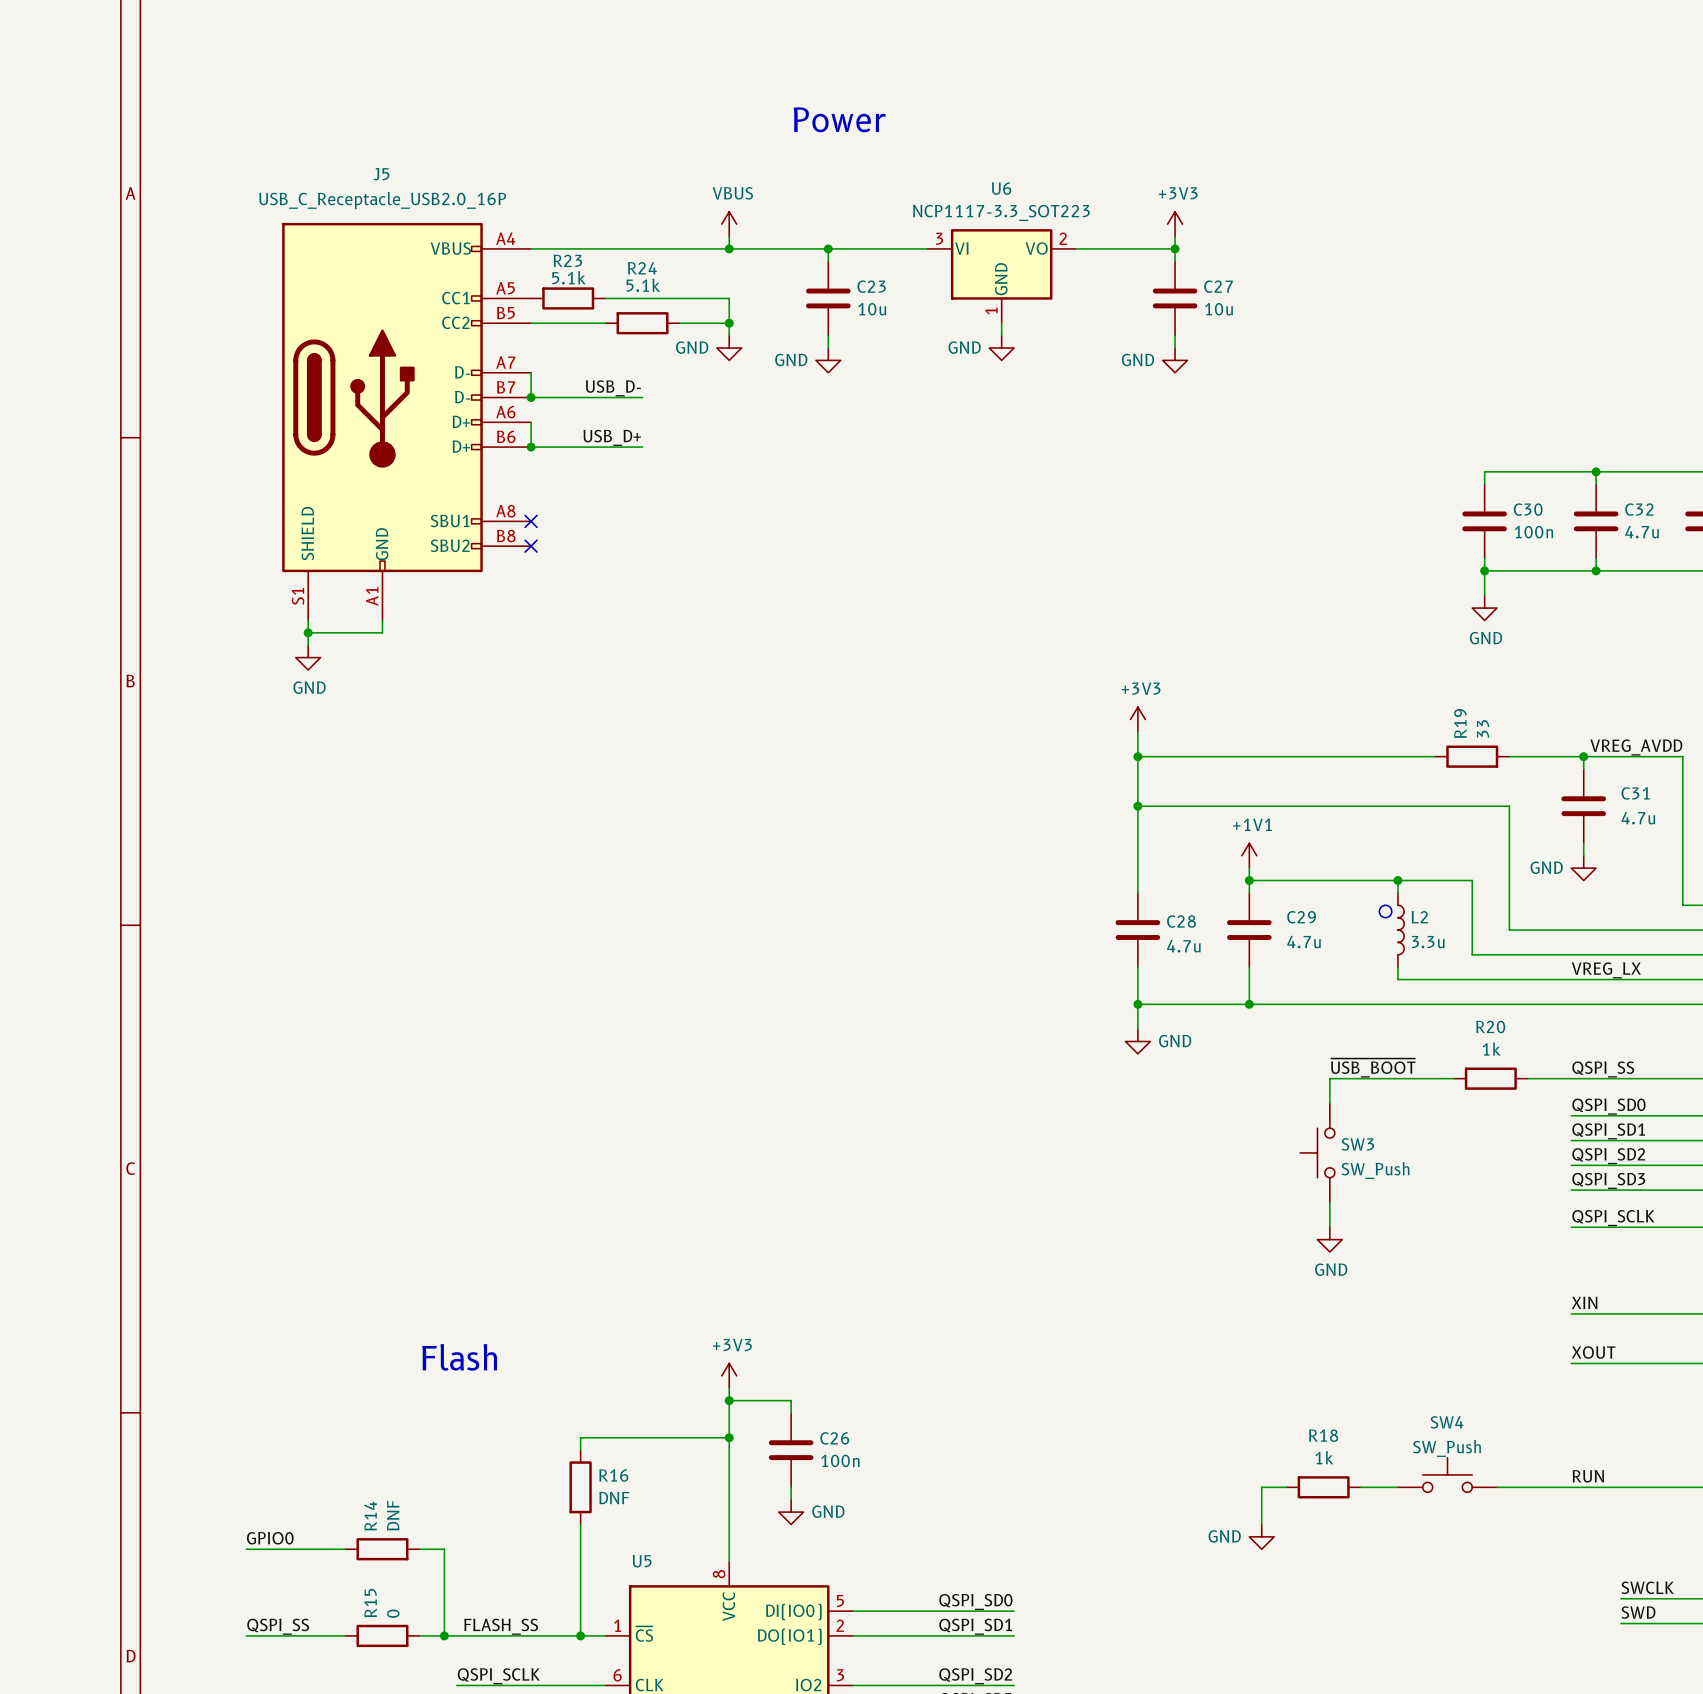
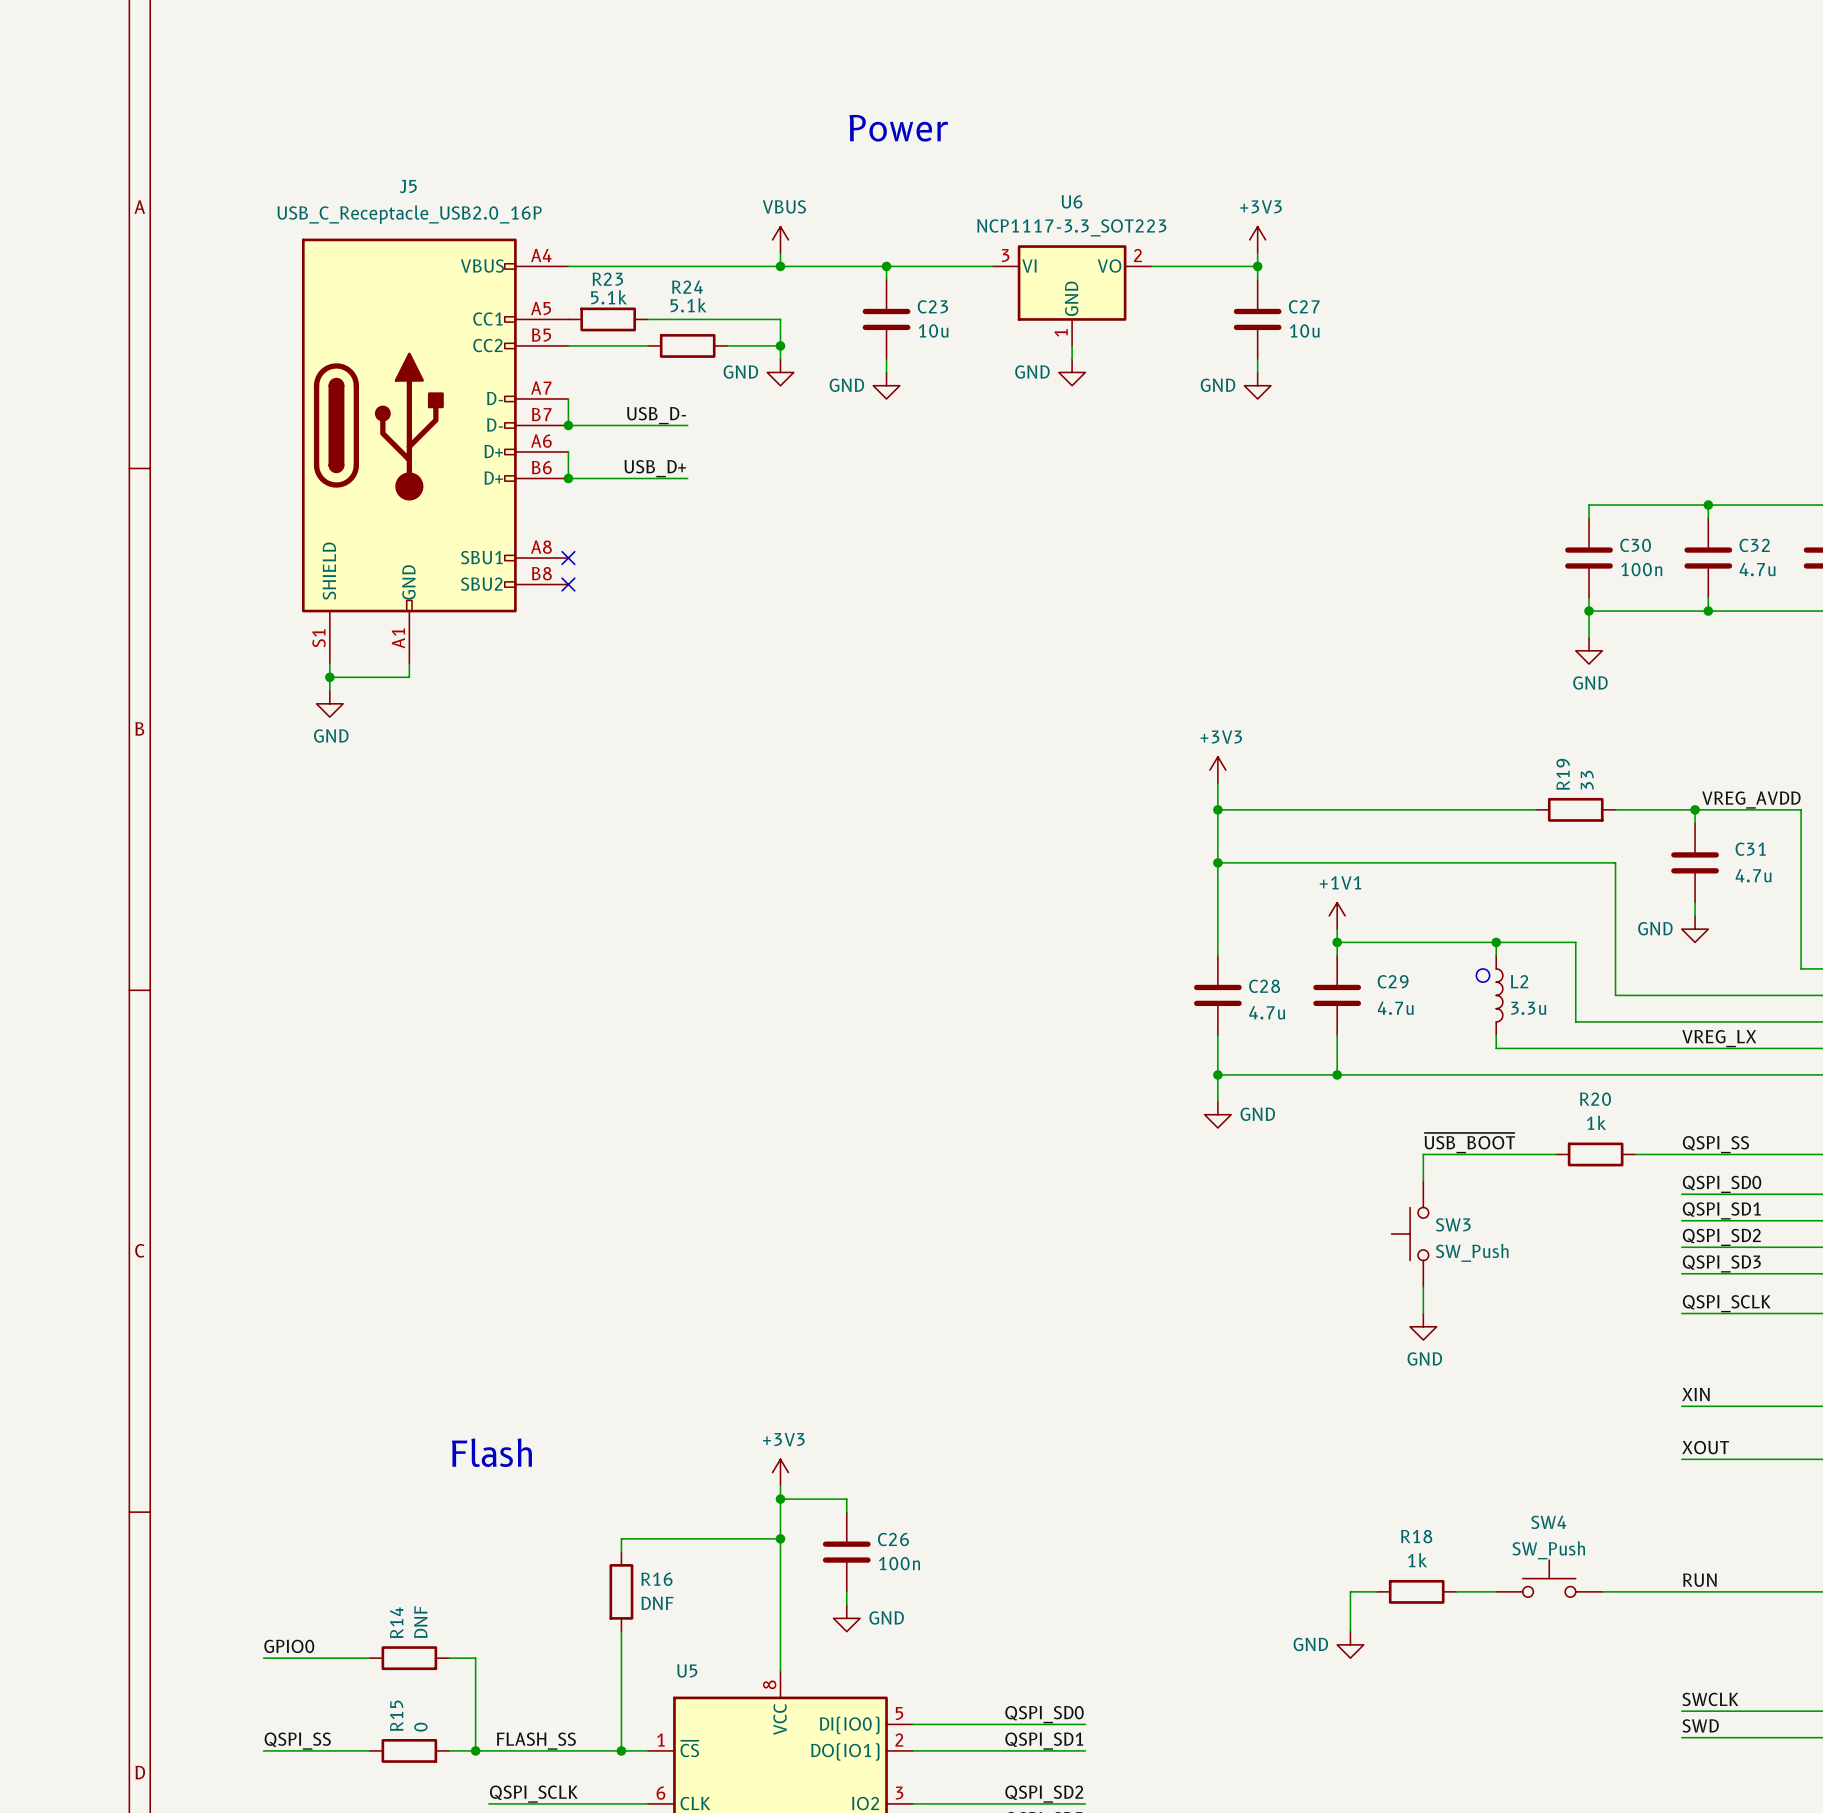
label position: SWCLK (1647, 1587) -> SWCLK (1710, 1699)
wire: none -> (1681, 1711) (1734, 1711)
label position: SWD (1638, 1612) -> SWD (1700, 1725)
wire: none -> (1681, 1737) (1734, 1737)

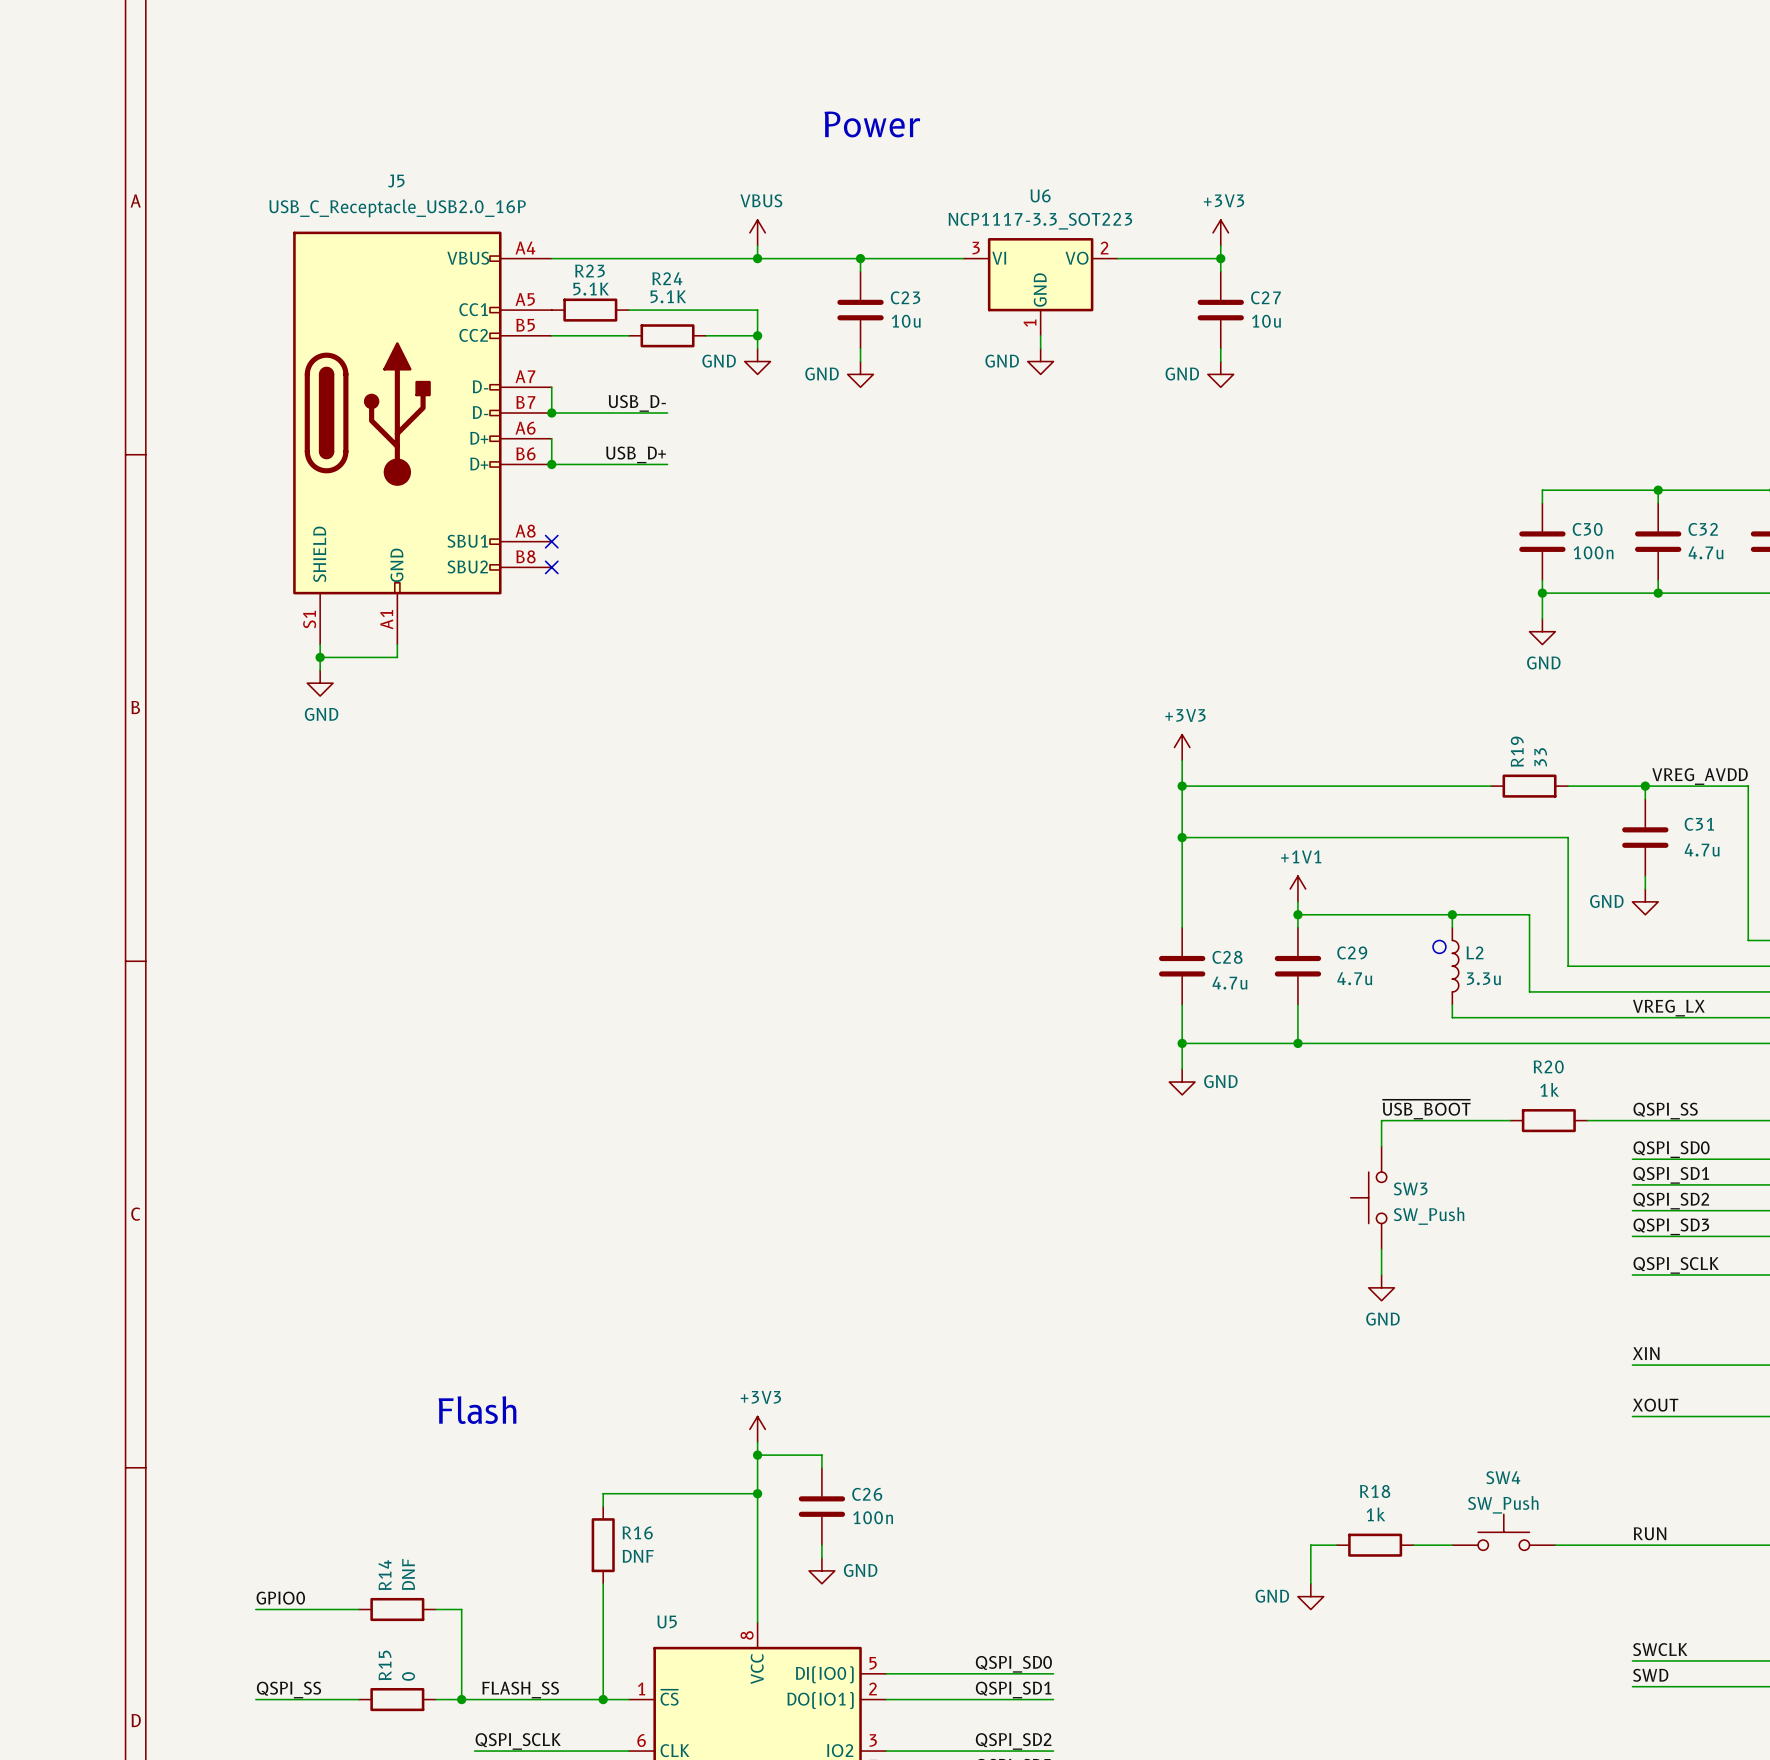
R23 value: 5.1k (609, 297) -> 5.1K (591, 289)
R24 value: 5.1k (688, 305) -> 5.1K (668, 296)

